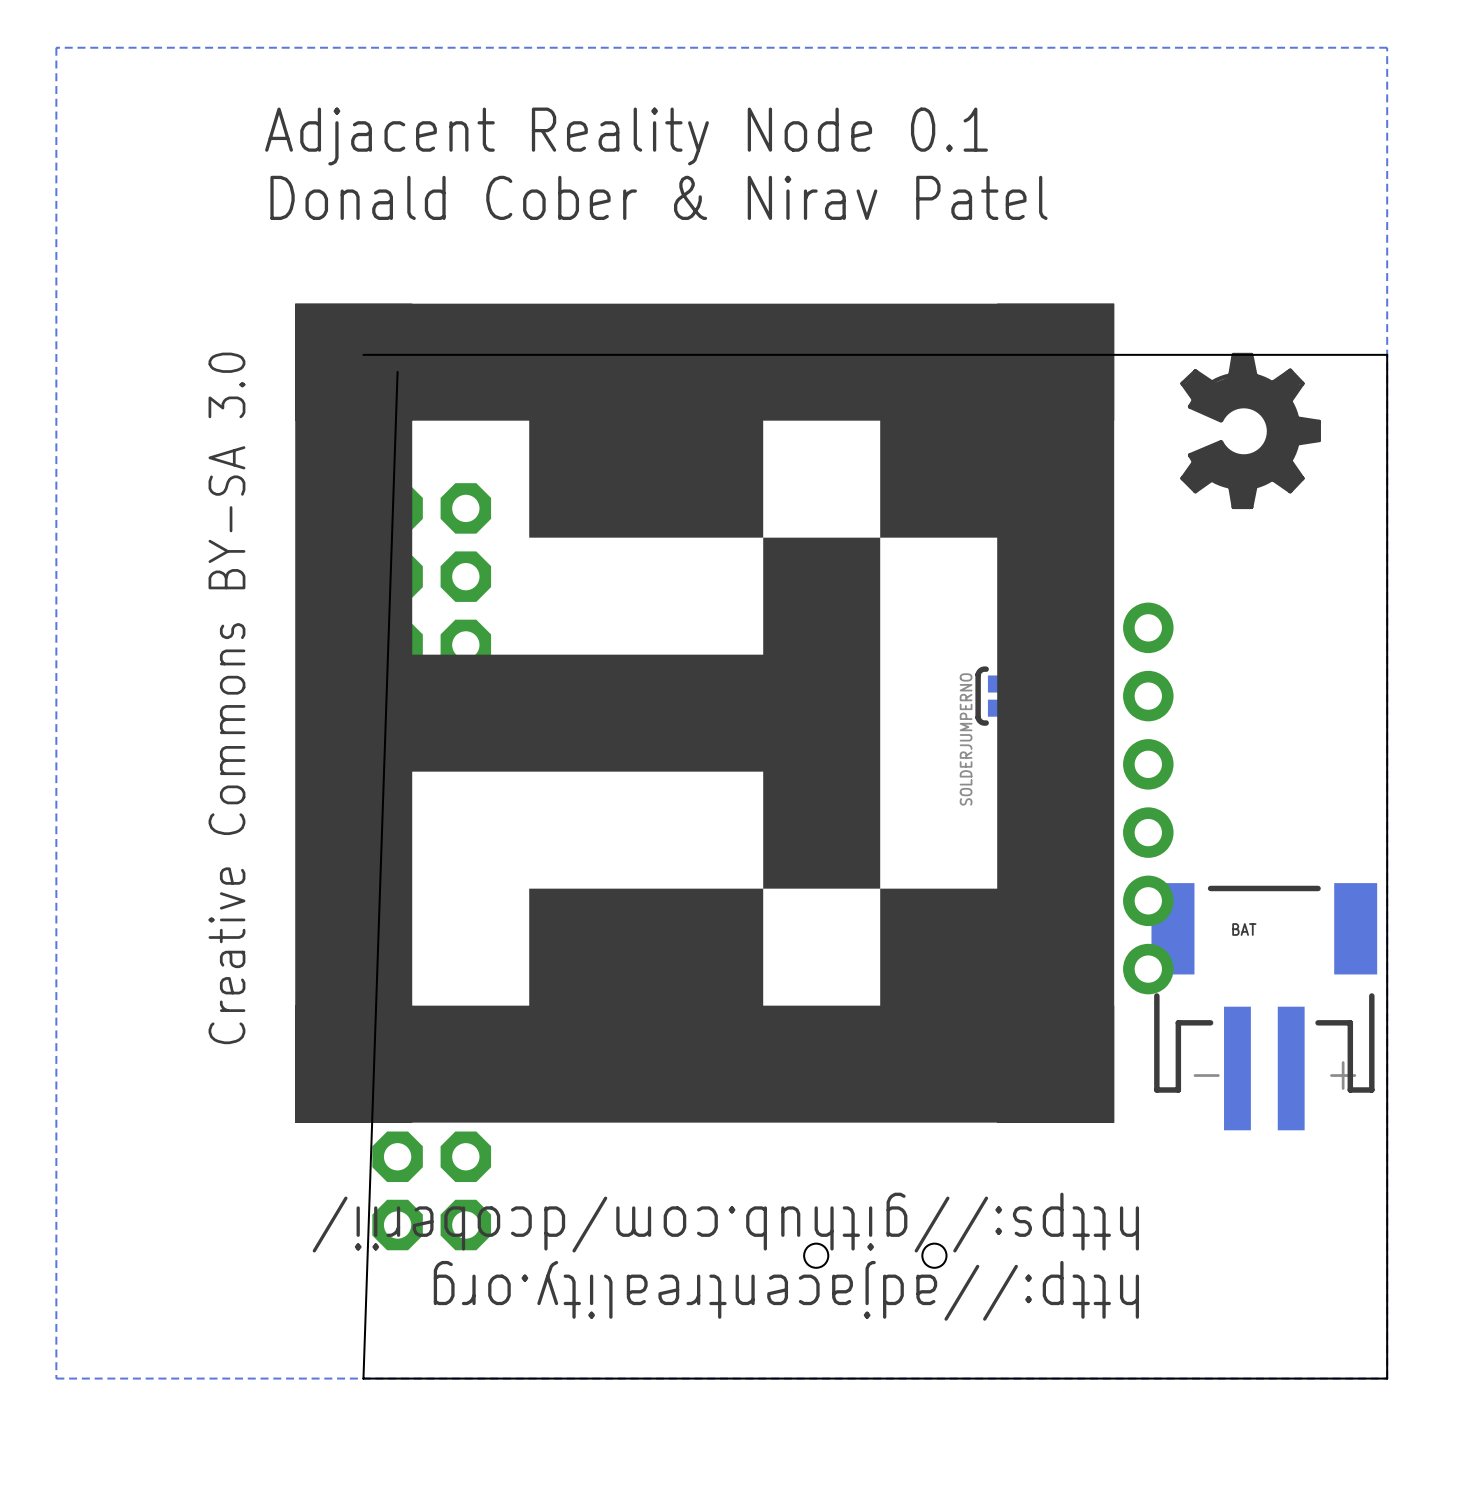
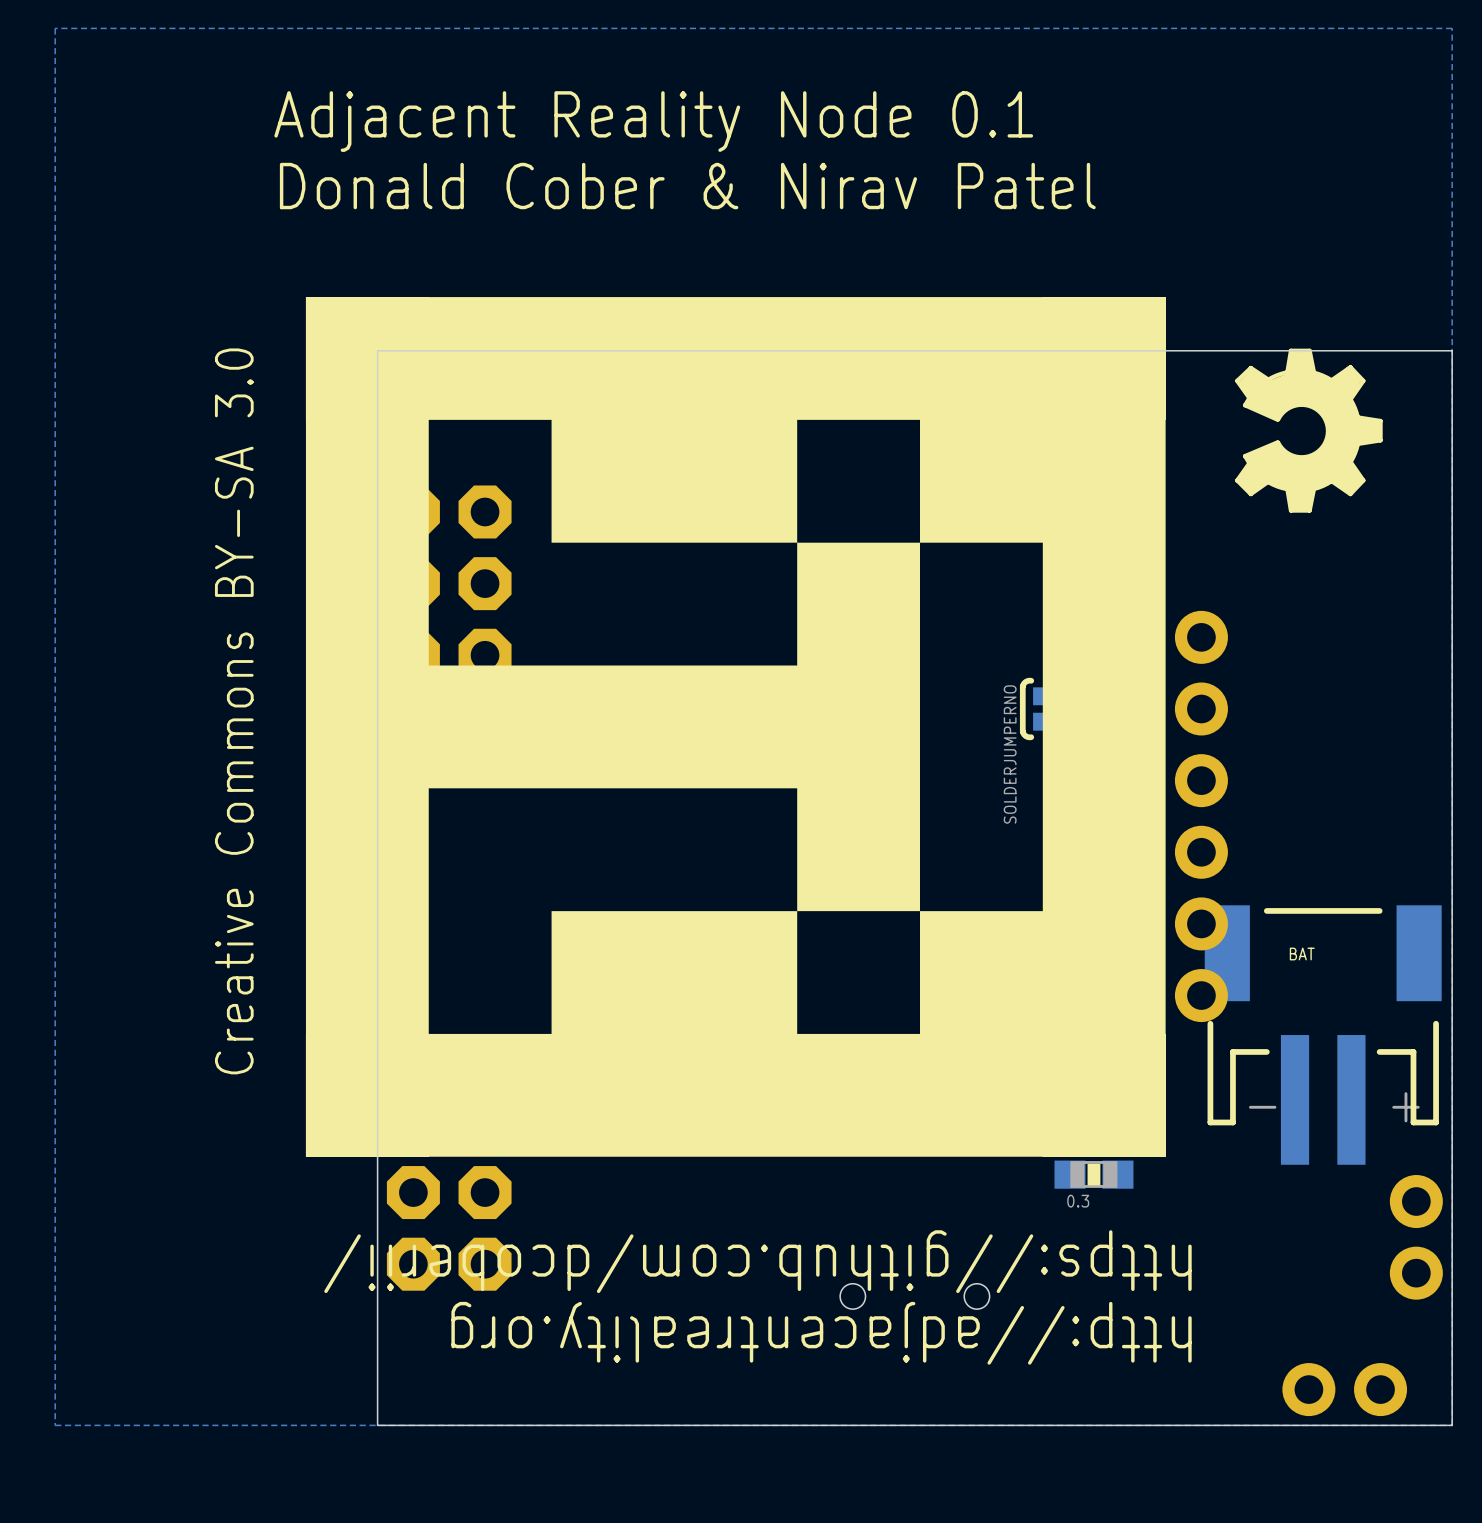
board edge: (397, 371) (363, 1378) -> (377, 350) (377, 1425)
part: none -> 0.3 (1093, 1174)
part: none -> (1416, 1237)
part: none -> (1344, 1389)

